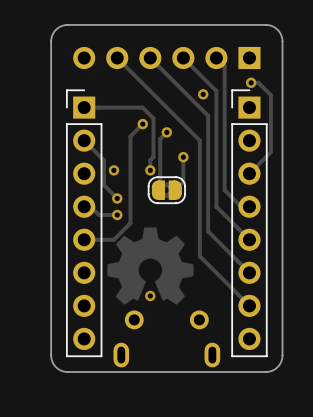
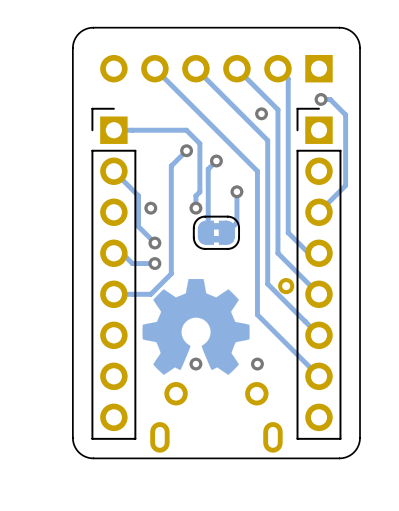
part: none -> (286, 286)
via: none -> (257, 364)

